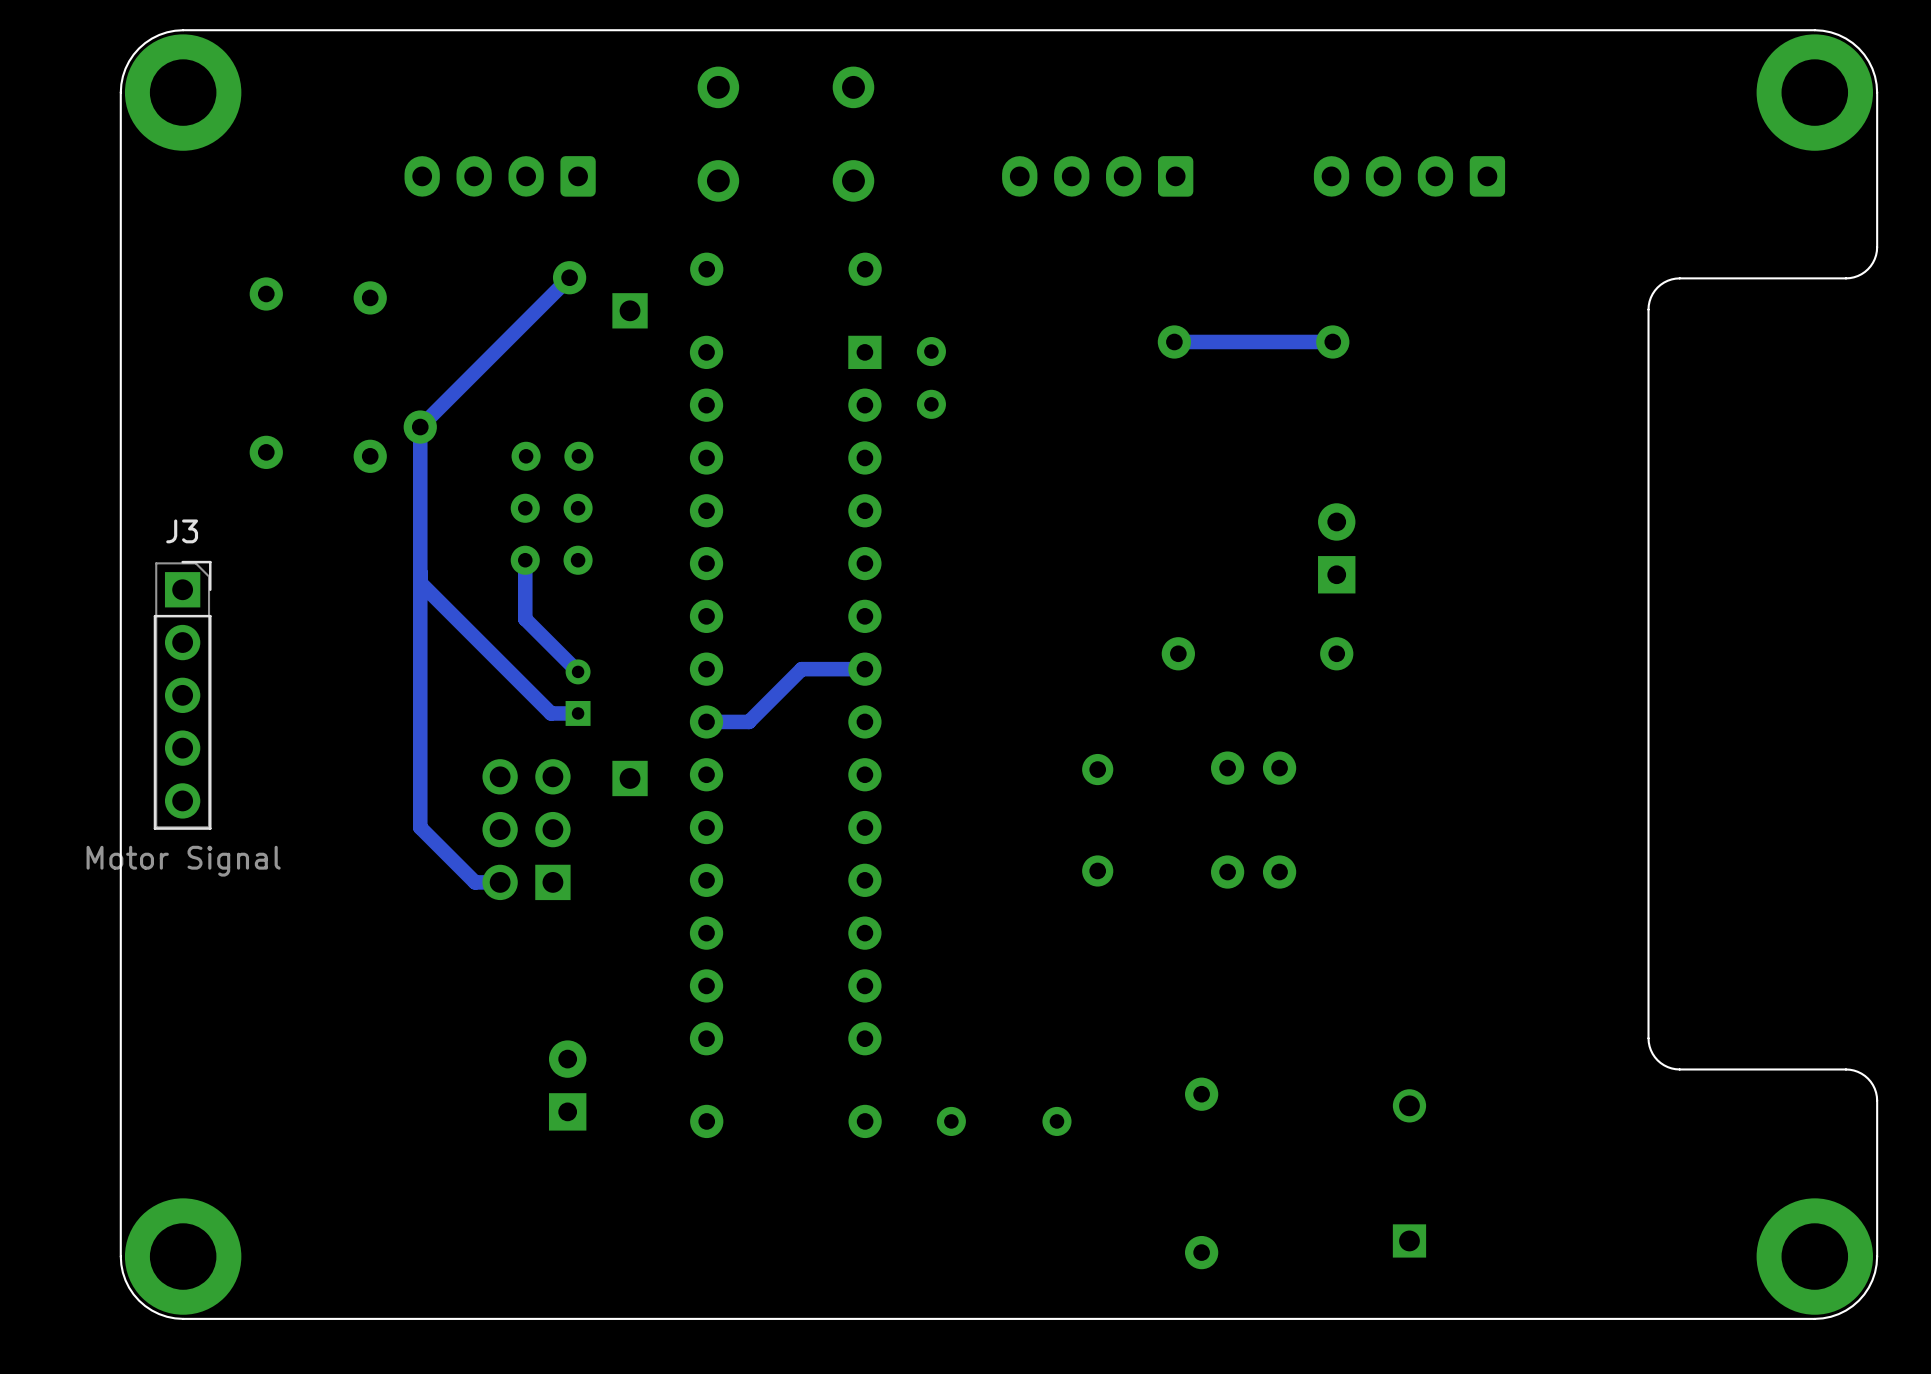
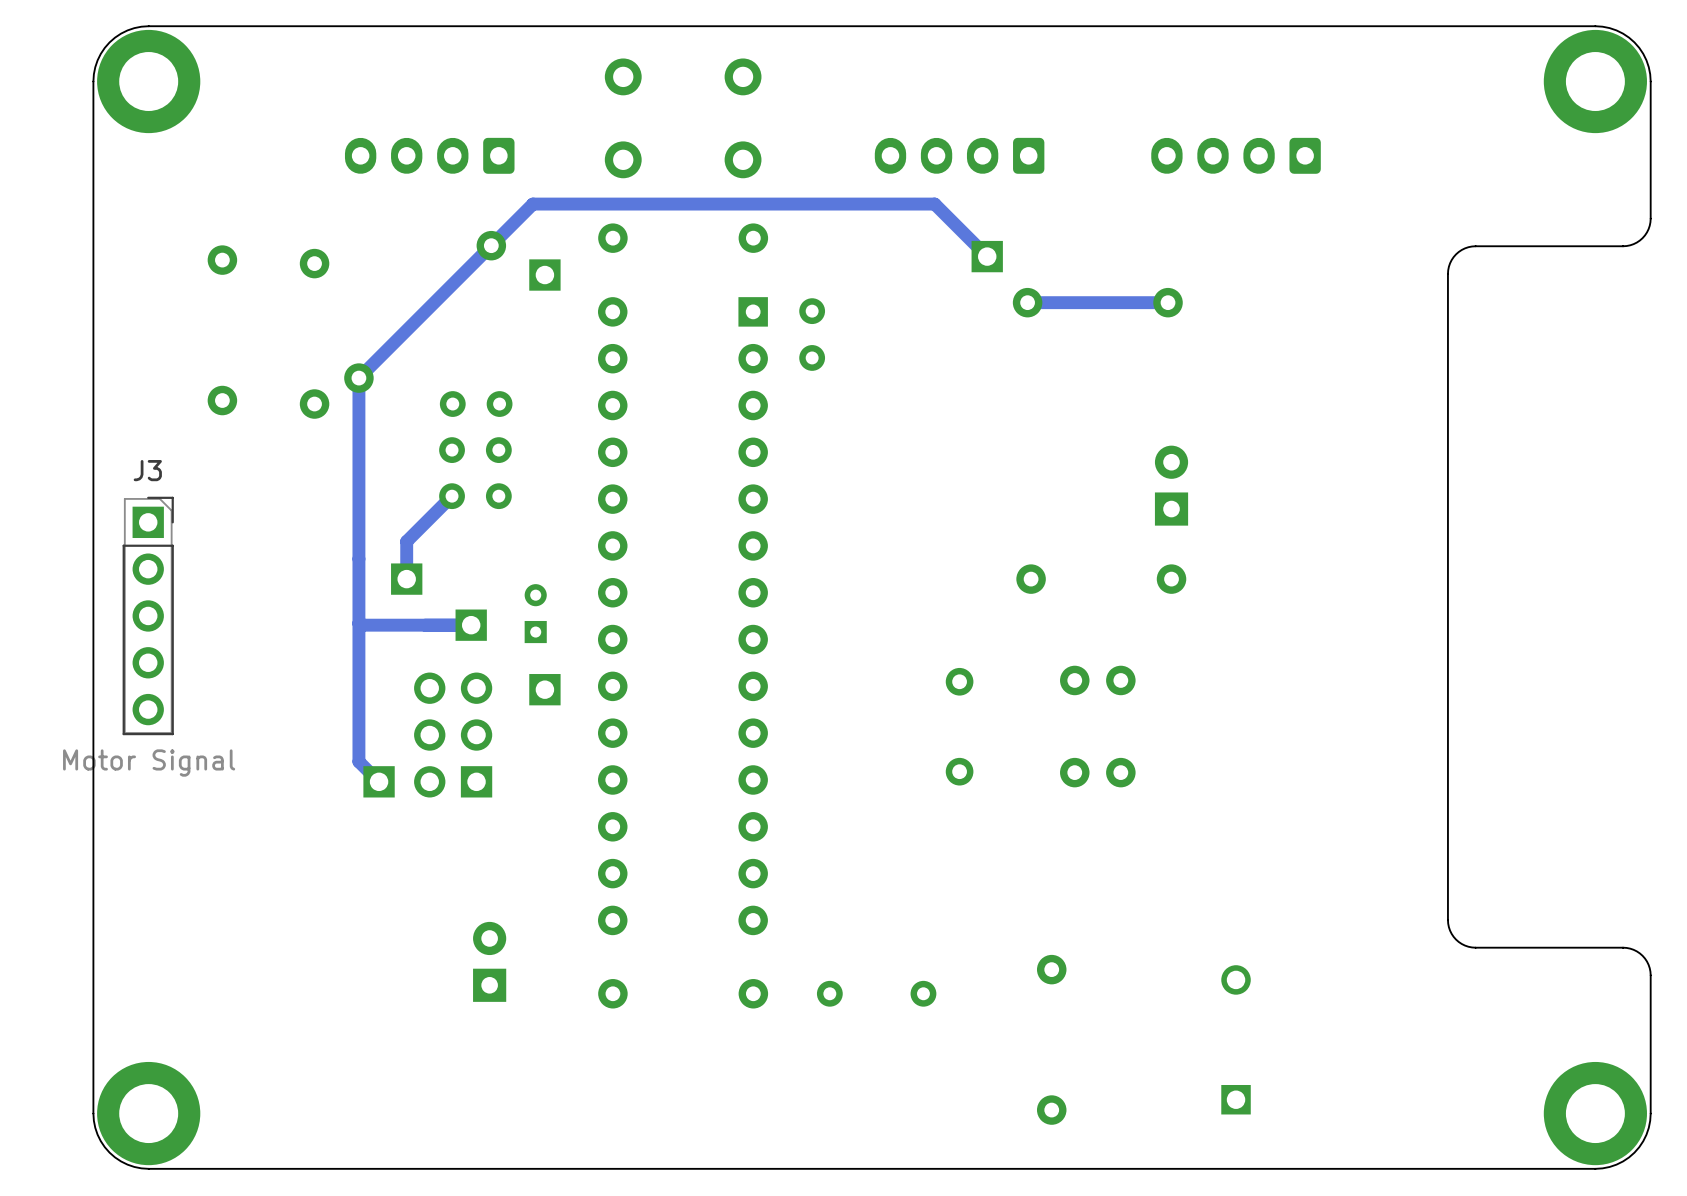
track: none -> (491, 245) (532, 204) (934, 204) (987, 256)
part: none -> (987, 256)
track: (525, 560) (525, 619) (578, 671) -> (452, 496) (406, 541) (406, 579)
track: (420, 582) (551, 713) (578, 713) -> none
part: none -> (406, 579)
track: (864, 669) (801, 669) (748, 721) (706, 721) -> none
part position: (578, 692) -> (535, 613)
track: none -> (358, 623) (360, 625) (471, 625)
part: none -> (471, 625)
track: (420, 827) (475, 882) (500, 882) -> (358, 733) (358, 761) (379, 781)
part: none -> (379, 781)

